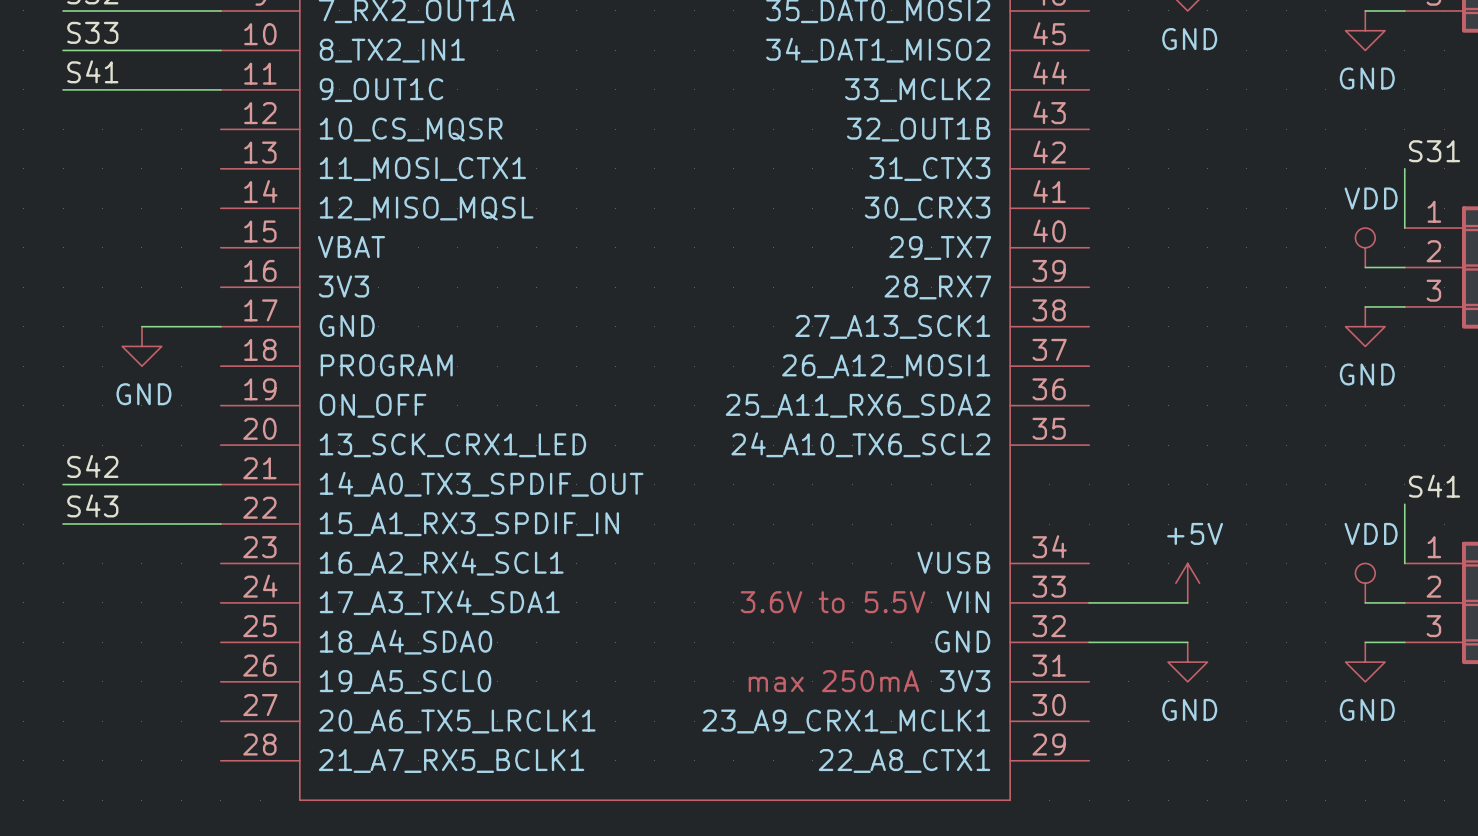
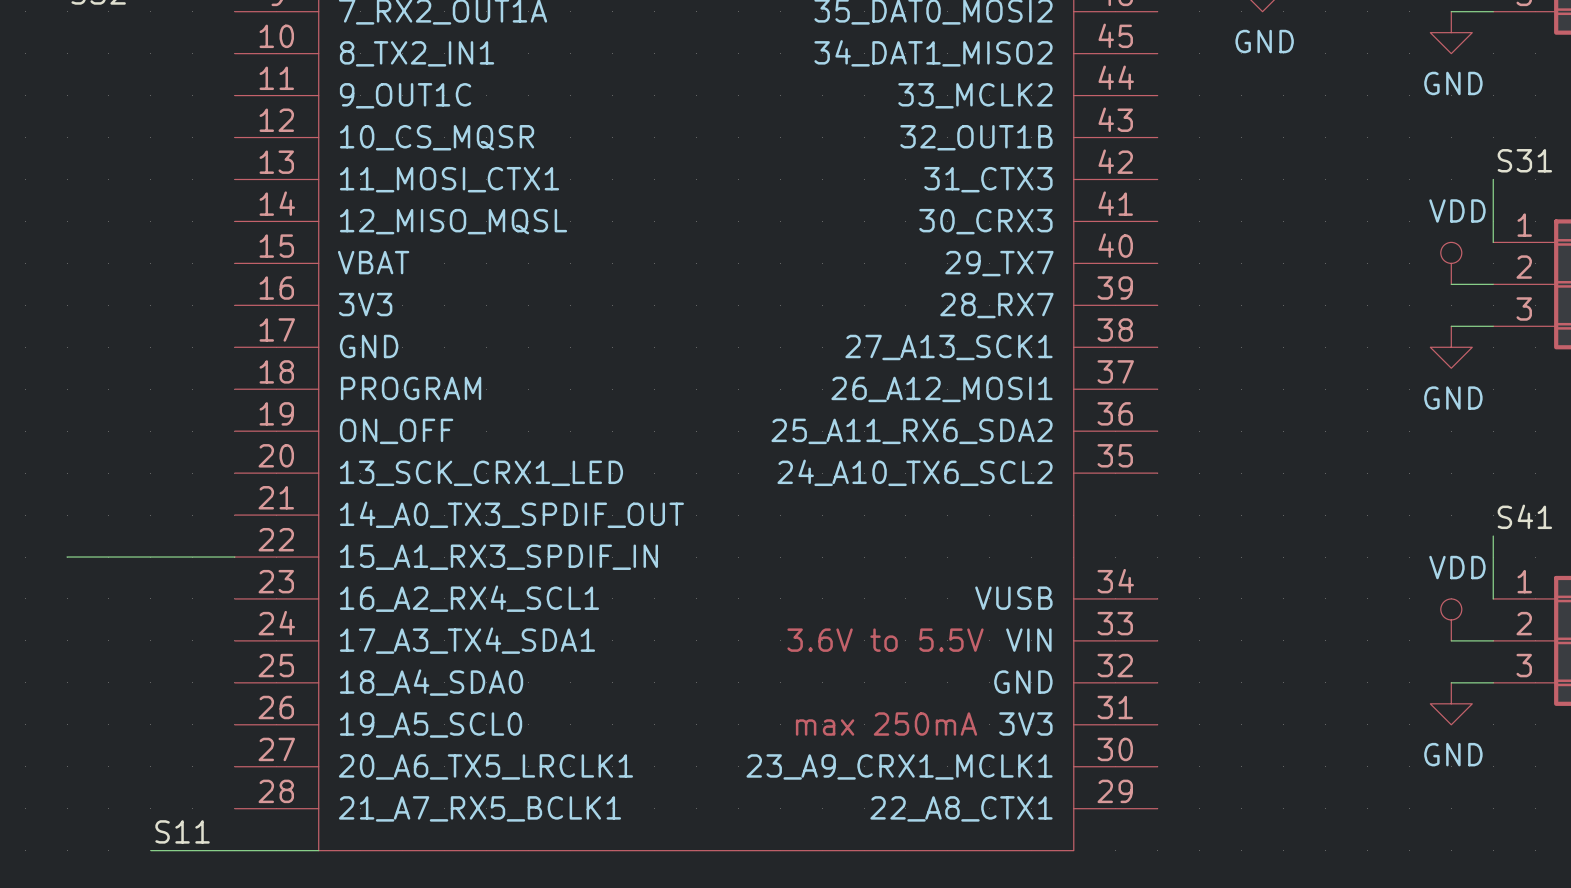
wire: (63, 10) (220, 10) -> none
label: S33 (92, 32) -> none
wire: (63, 50) (220, 50) -> none
label: S41 (92, 71) -> none
wire: (63, 89) (220, 89) -> none
wire: (141, 326) (220, 326) -> none
power symbol: GND (141, 346) -> none
label: S42 (92, 466) -> none
wire: (63, 484) (220, 484) -> (150, 850) (318, 850)
label: S43 (92, 505) -> none
power symbol: +5V (1187, 583) -> none
wire: (1089, 602) (1187, 602) -> none
wire: (1089, 642) (1187, 642) -> none
power symbol: GND (1187, 662) -> none
label: none -> S11 (182, 831)

